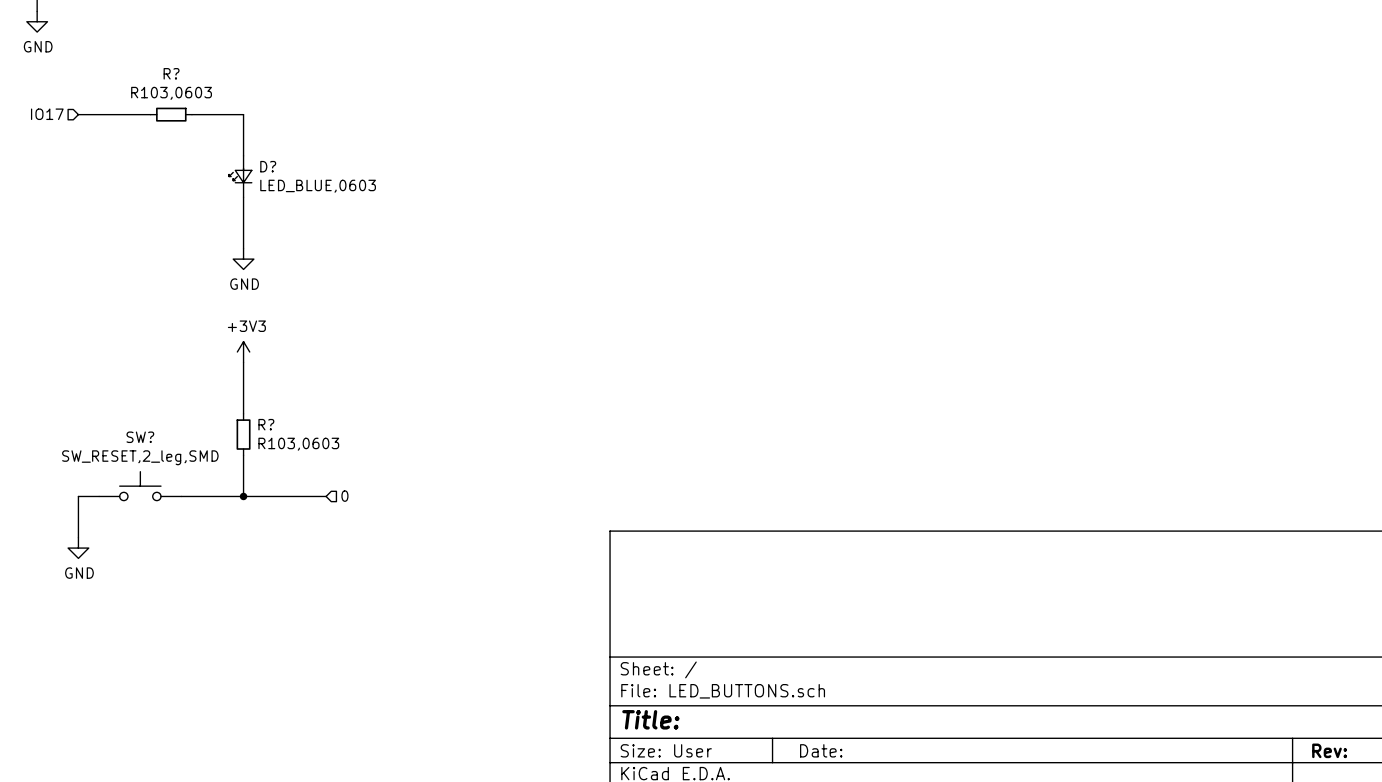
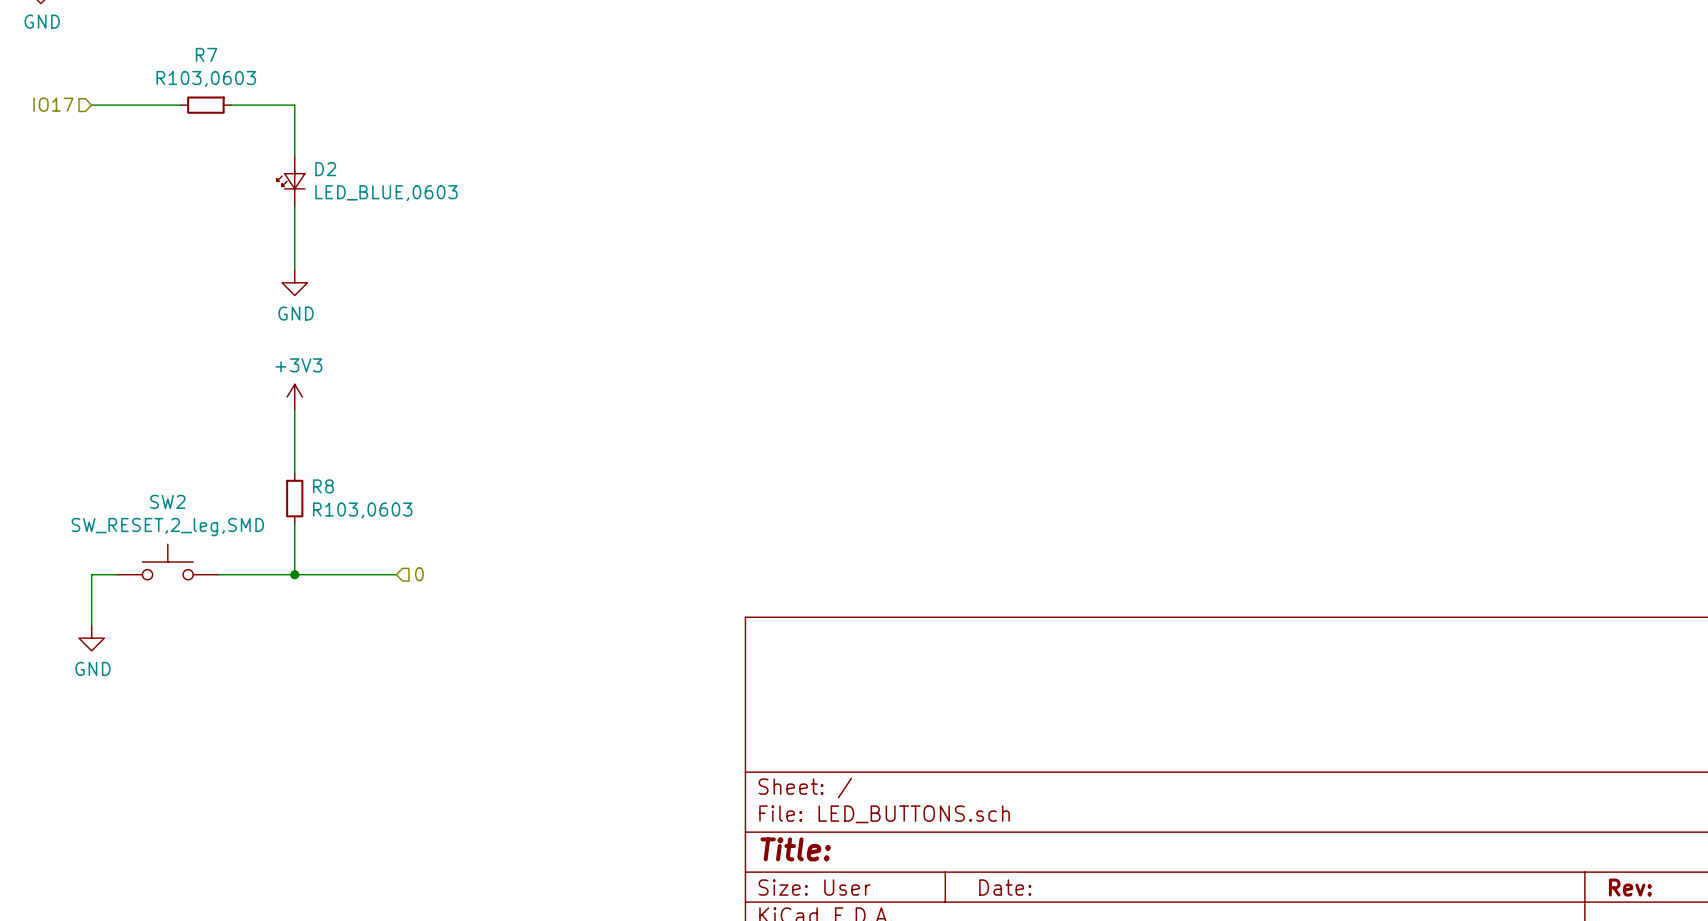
R? name: R? (171, 73) -> R7 (206, 54)
D? name: D? (268, 166) -> D2 (325, 169)
R? name: R? (266, 424) -> R8 (323, 486)
SW? name: SW? (140, 437) -> SW2 (167, 501)

